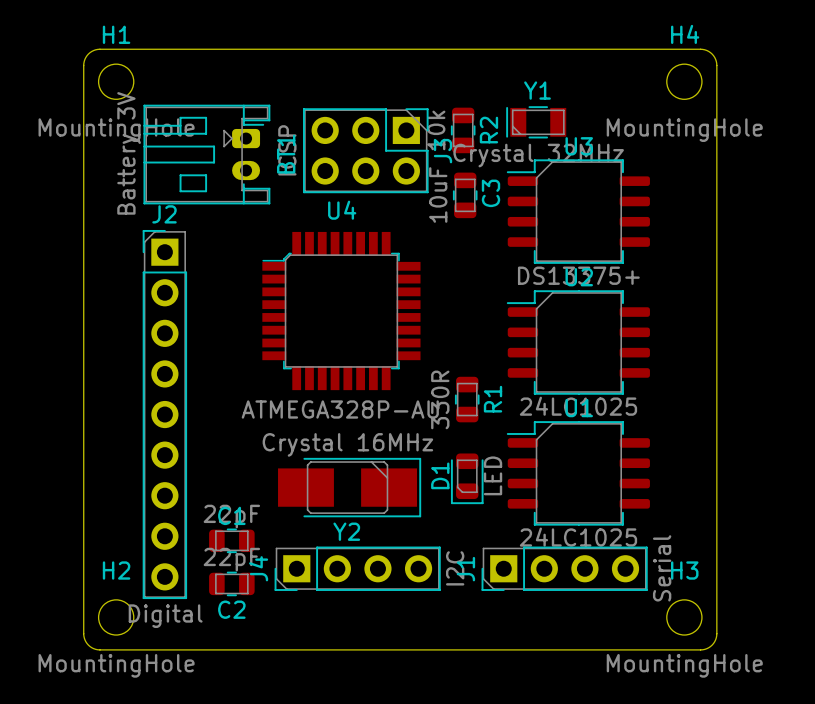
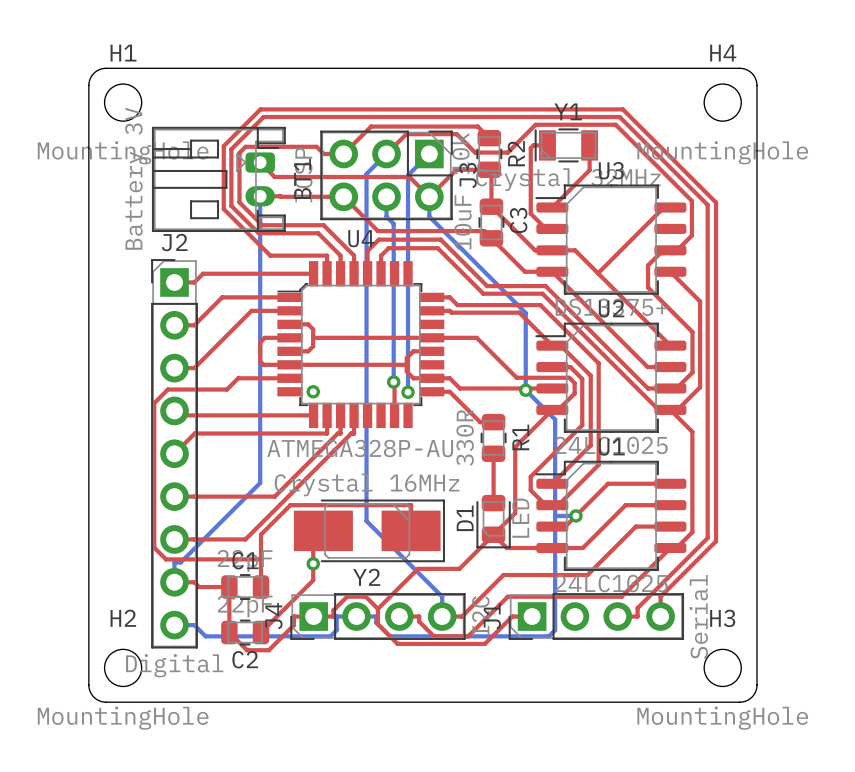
top track: none -> (489, 138) (477, 126) (371, 126) (343, 153) (323, 153) (316, 146) (245, 146) (239, 152) (239, 202) (262, 225) (323, 225) (354, 255) (354, 273)
top track: none -> (547, 145) (533, 145) (530, 148) (530, 213) (545, 228) (552, 228)
top track: none -> (589, 145) (589, 170) (552, 207)
top track: none -> (386, 153) (406, 134) (456, 134) (475, 152) (507, 152) (535, 124) (615, 124) (691, 200) (691, 235) (677, 250) (663, 250) (648, 265) (648, 287) (692, 332) (692, 372) (676, 388) (647, 388) (545, 286) (487, 286) (440, 239) (378, 239) (367, 250) (367, 273)
bottom track: none -> (386, 153) (366, 173) (366, 521) (442, 596) (442, 616)
bottom track: none -> (429, 153) (408, 175) (408, 392)
top track: none -> (260, 162) (274, 176) (409, 176) (429, 196) (456, 169) (489, 169) (491, 171) (491, 206) (535, 250) (575, 250) (670, 345)
top track: none -> (260, 196) (343, 196) (377, 231) (484, 231) (524, 271) (552, 271) (647, 367) (670, 367)
bottom track: none -> (260, 196) (260, 482) (180, 562) (174, 562) (174, 582)
bottom track: none -> (386, 196) (386, 216) (393, 223) (393, 382)
bottom track: none -> (429, 196) (429, 216) (525, 313) (525, 390) (555, 419) (555, 630) (548, 636) (389, 636) (376, 622) (376, 616) (336, 616) (336, 630) (330, 636) (205, 636) (194, 625) (174, 625)
top track: none -> (670, 207) (663, 207) (598, 273)
top track: none -> (670, 271) (700, 301) (700, 387) (677, 409) (658, 409) (542, 293) (483, 293) (437, 248) (388, 248) (381, 255) (381, 273)
top track: none -> (313, 273) (203, 273) (194, 282) (174, 282)
top track: none -> (327, 273) (327, 255) (270, 255) (223, 209) (223, 146) (260, 109) (622, 109) (716, 202) (716, 541) (660, 596) (660, 616)
top track: none -> (340, 273) (340, 255) (318, 233) (258, 233) (231, 205) (231, 149) (263, 117) (619, 117) (707, 204) (707, 538) (637, 608) (637, 616) (617, 616)
top track: none -> (290, 297) (222, 297) (194, 325) (174, 325)
top track: none -> (431, 297) (449, 297) (457, 305) (540, 305) (598, 363) (598, 464) (558, 505) (545, 505) (530, 490) (530, 476) (582, 425) (582, 378) (570, 367) (552, 367)
top track: none -> (290, 310) (251, 310) (194, 368) (174, 368)
top track: none -> (431, 310) (519, 312) (552, 345) (560, 345) (590, 375) (590, 445) (552, 483)
top track: none -> (290, 324) (308, 324) (313, 329) (313, 346) (308, 351) (290, 351)
top track: none -> (290, 337) (264, 337) (260, 342) (260, 361) (263, 364) (406, 364)
top track: none -> (313, 337) (476, 337) (516, 377) (569, 377) (574, 383) (574, 393) (558, 409) (552, 409) (515, 447) (515, 513) (459, 568) (417, 568) (377, 608)
top track: none -> (431, 351) (413, 351) (406, 358) (406, 371) (413, 378) (449, 378) (459, 388) (552, 388)
top track: none -> (290, 378) (238, 378) (226, 389) (167, 389) (154, 403) (154, 547) (165, 559) (260, 559)
top track: none -> (393, 382) (394, 415)
via: none -> (393, 382)
via: none -> (525, 390)
via: none -> (313, 391)
top track: none -> (431, 391) (449, 391) (480, 422) (493, 422)
via: none -> (408, 392)
top track: none -> (670, 409) (692, 431) (692, 532) (676, 548) (670, 548) (621, 596) (507, 596) (468, 636) (433, 636) (419, 621) (419, 616) (399, 616)
top track: none -> (174, 410) (178, 415) (313, 415)
top track: none -> (327, 415) (327, 433) (194, 433) (174, 453)
top track: none -> (340, 415) (340, 433) (337, 433) (274, 496) (174, 496)
top track: none -> (354, 415) (354, 433) (351, 433) (245, 539) (174, 539)
top track: none -> (493, 453) (493, 503)
top track: none -> (670, 483) (608, 483) (565, 526) (552, 526)
top track: none -> (670, 505) (625, 505) (582, 548) (506, 548) (493, 534)
bottom track: none -> (555, 515) (575, 515)
via: none -> (575, 515)
top track: none -> (670, 526) (635, 526) (587, 575) (503, 575) (462, 616) (442, 616)
top track: none -> (323, 530) (313, 541) (313, 580) (260, 632)
top track: none -> (411, 530) (411, 505) (290, 505) (260, 534) (260, 587)
via: none -> (313, 563)
top track: none -> (174, 582) (194, 582) (199, 587) (229, 587) (229, 632) (247, 650) (268, 650) (293, 625) (293, 616) (333, 616) (333, 610) (347, 596) (365, 596) (377, 608)
top track: none -> (377, 608) (377, 624) (397, 643) (484, 643) (512, 616) (532, 616)

